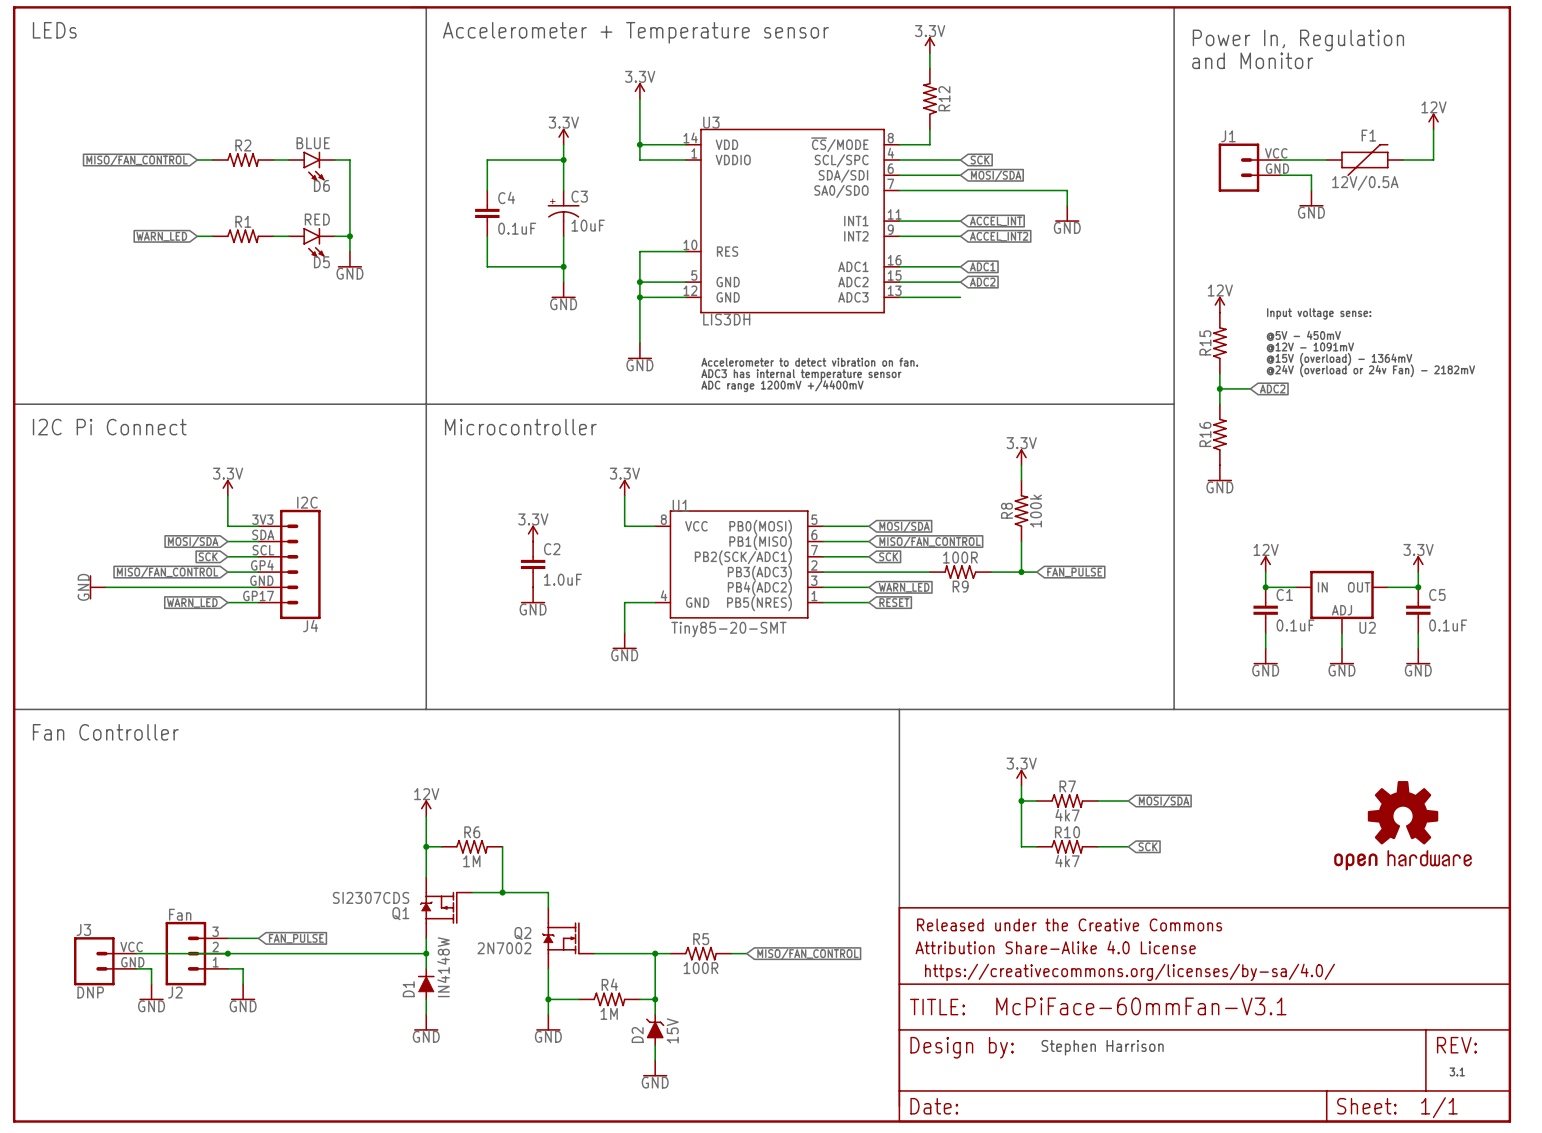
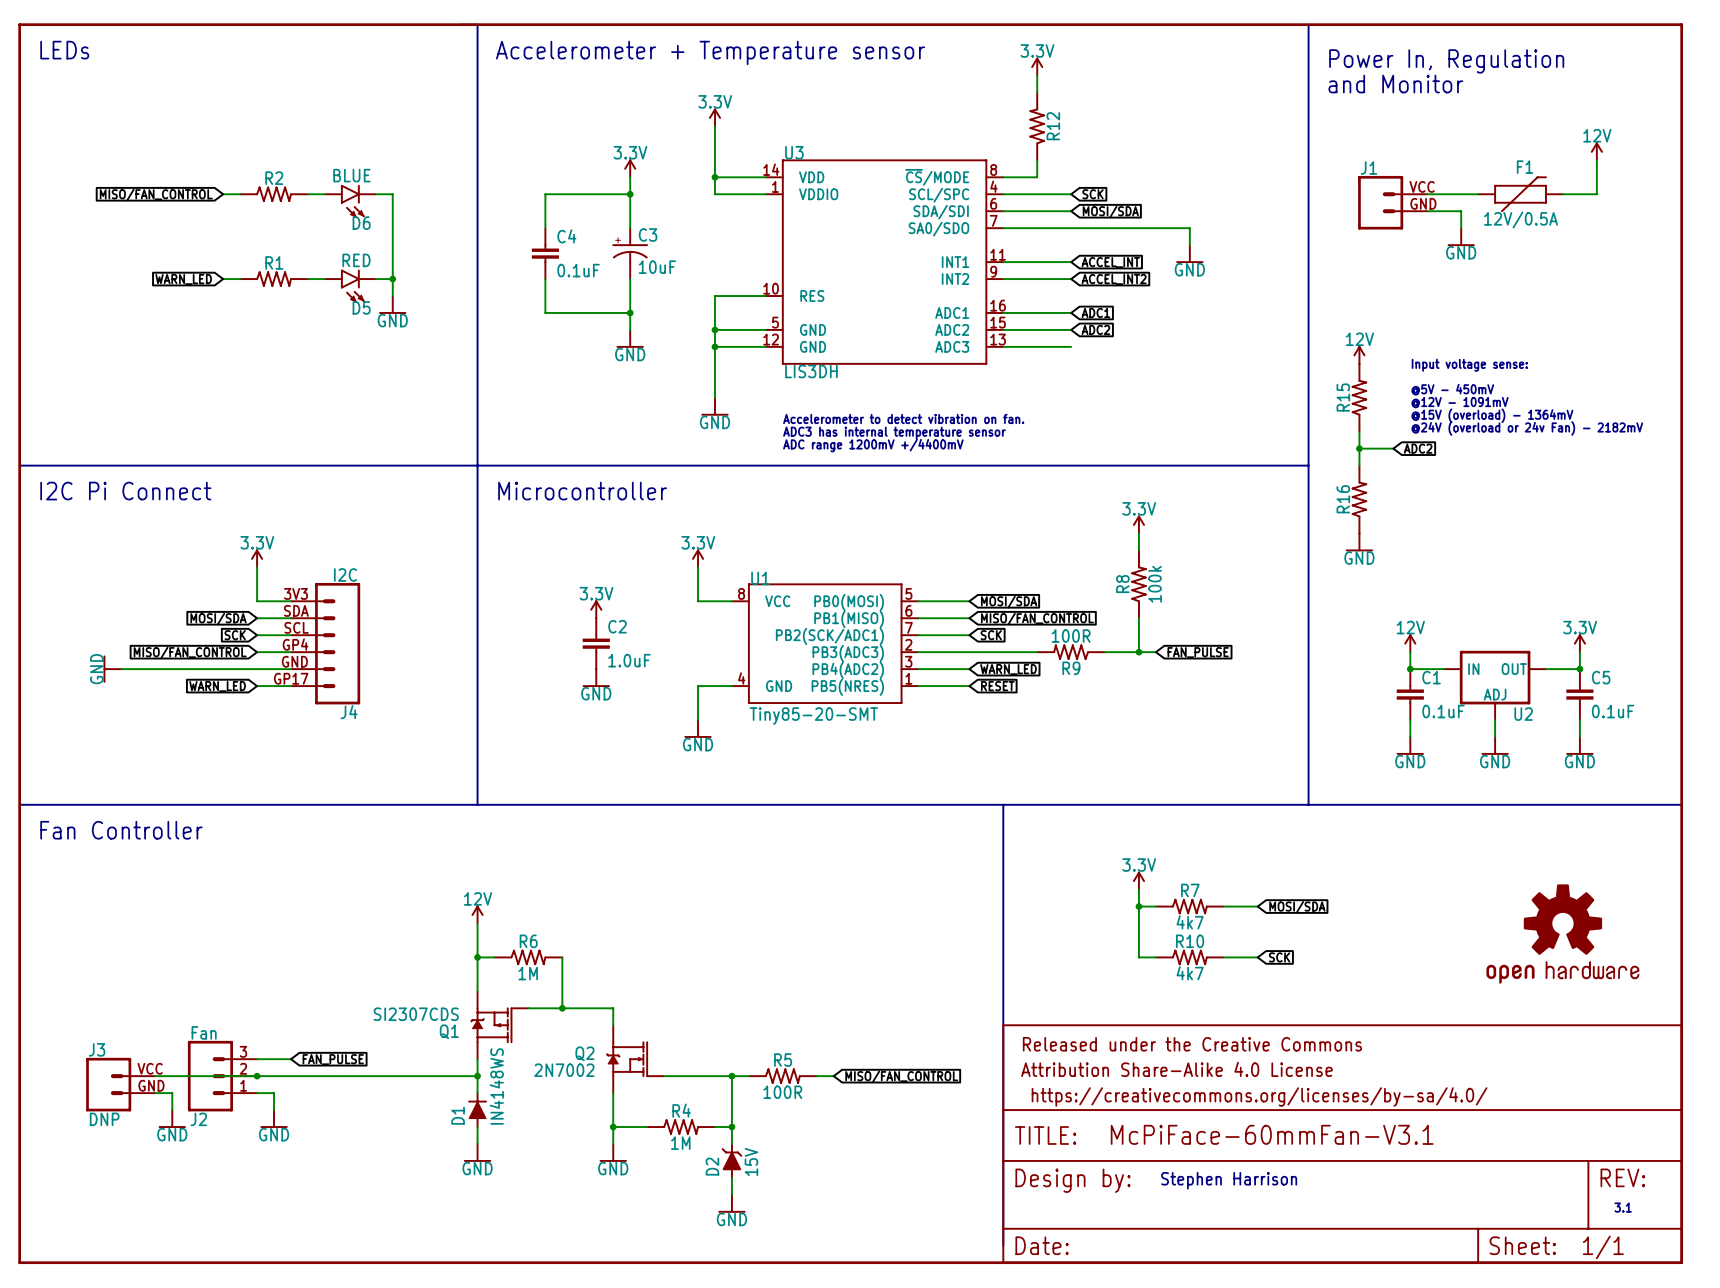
D1 value: IN4148W (443, 967) -> IN4148WS (496, 1086)

